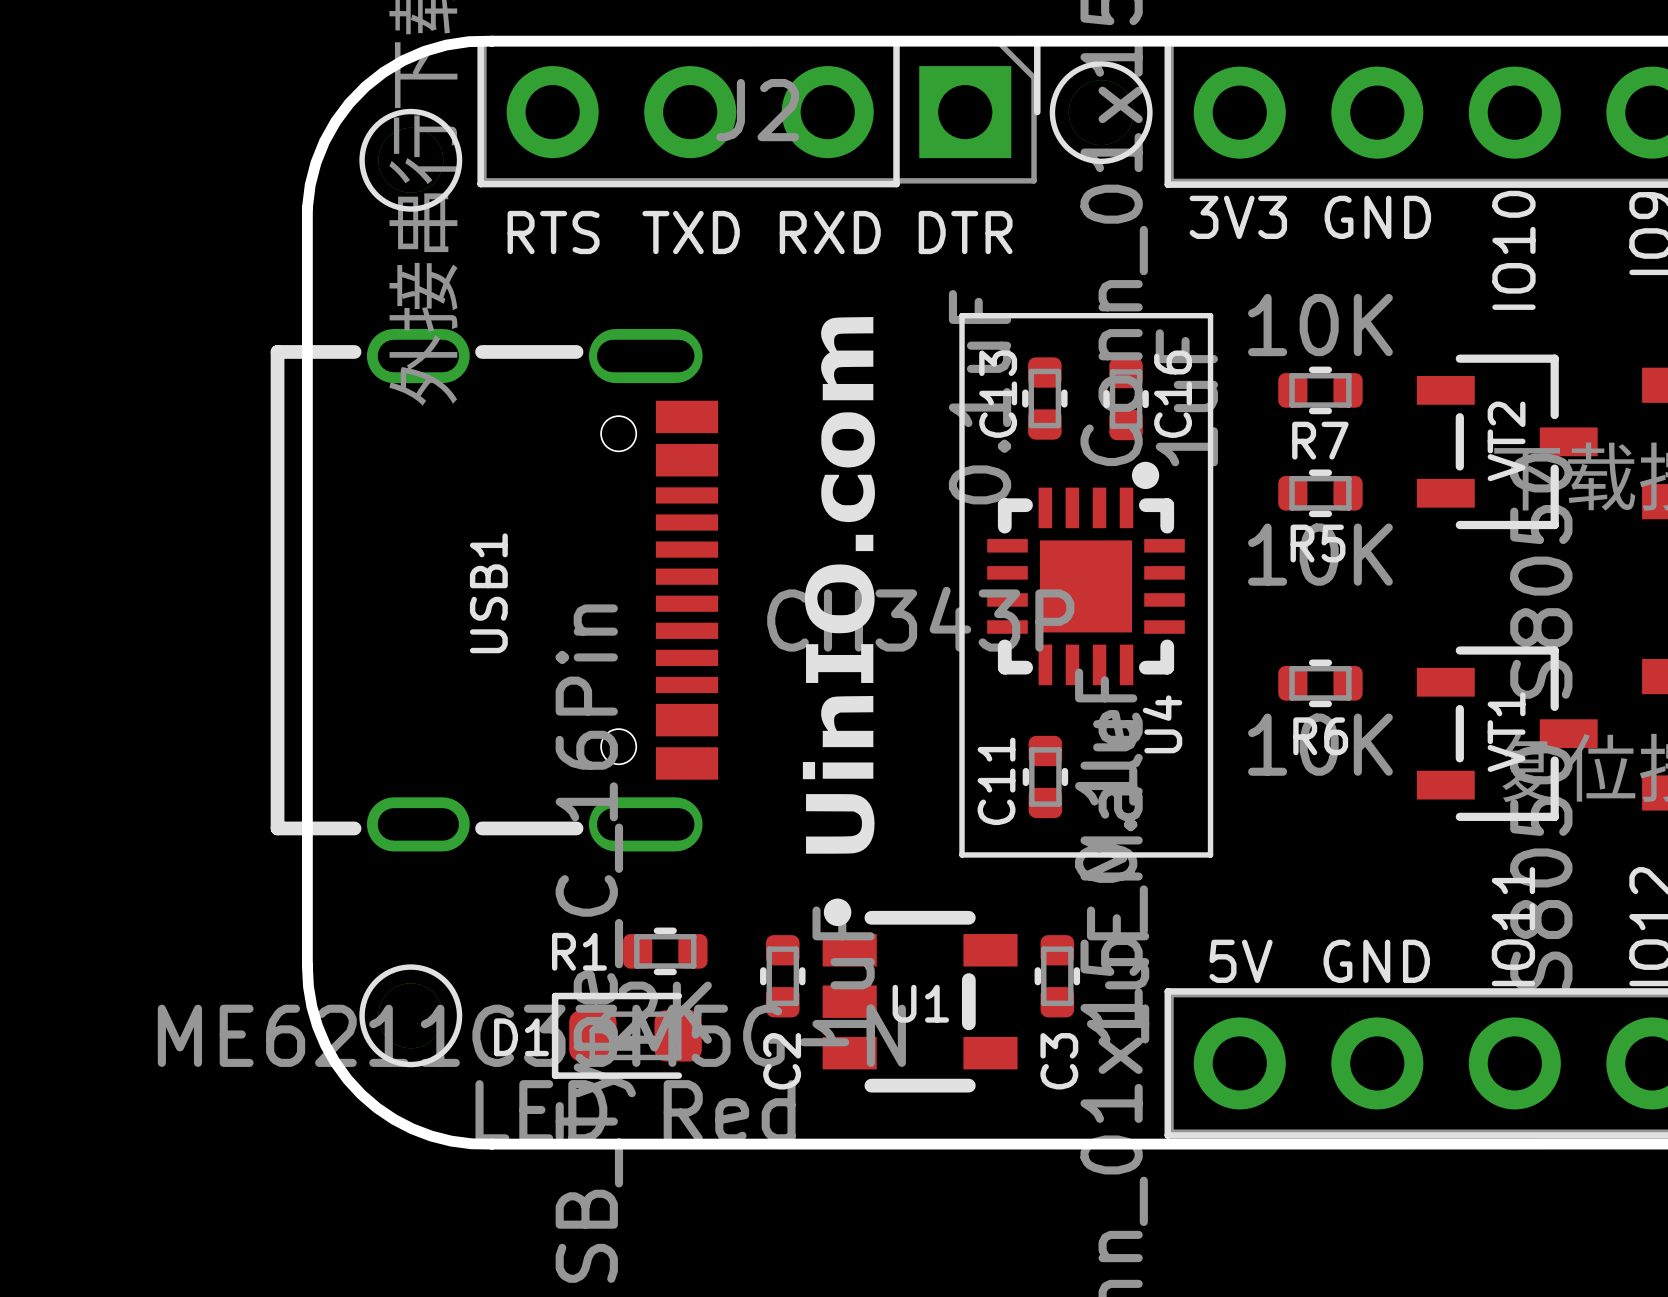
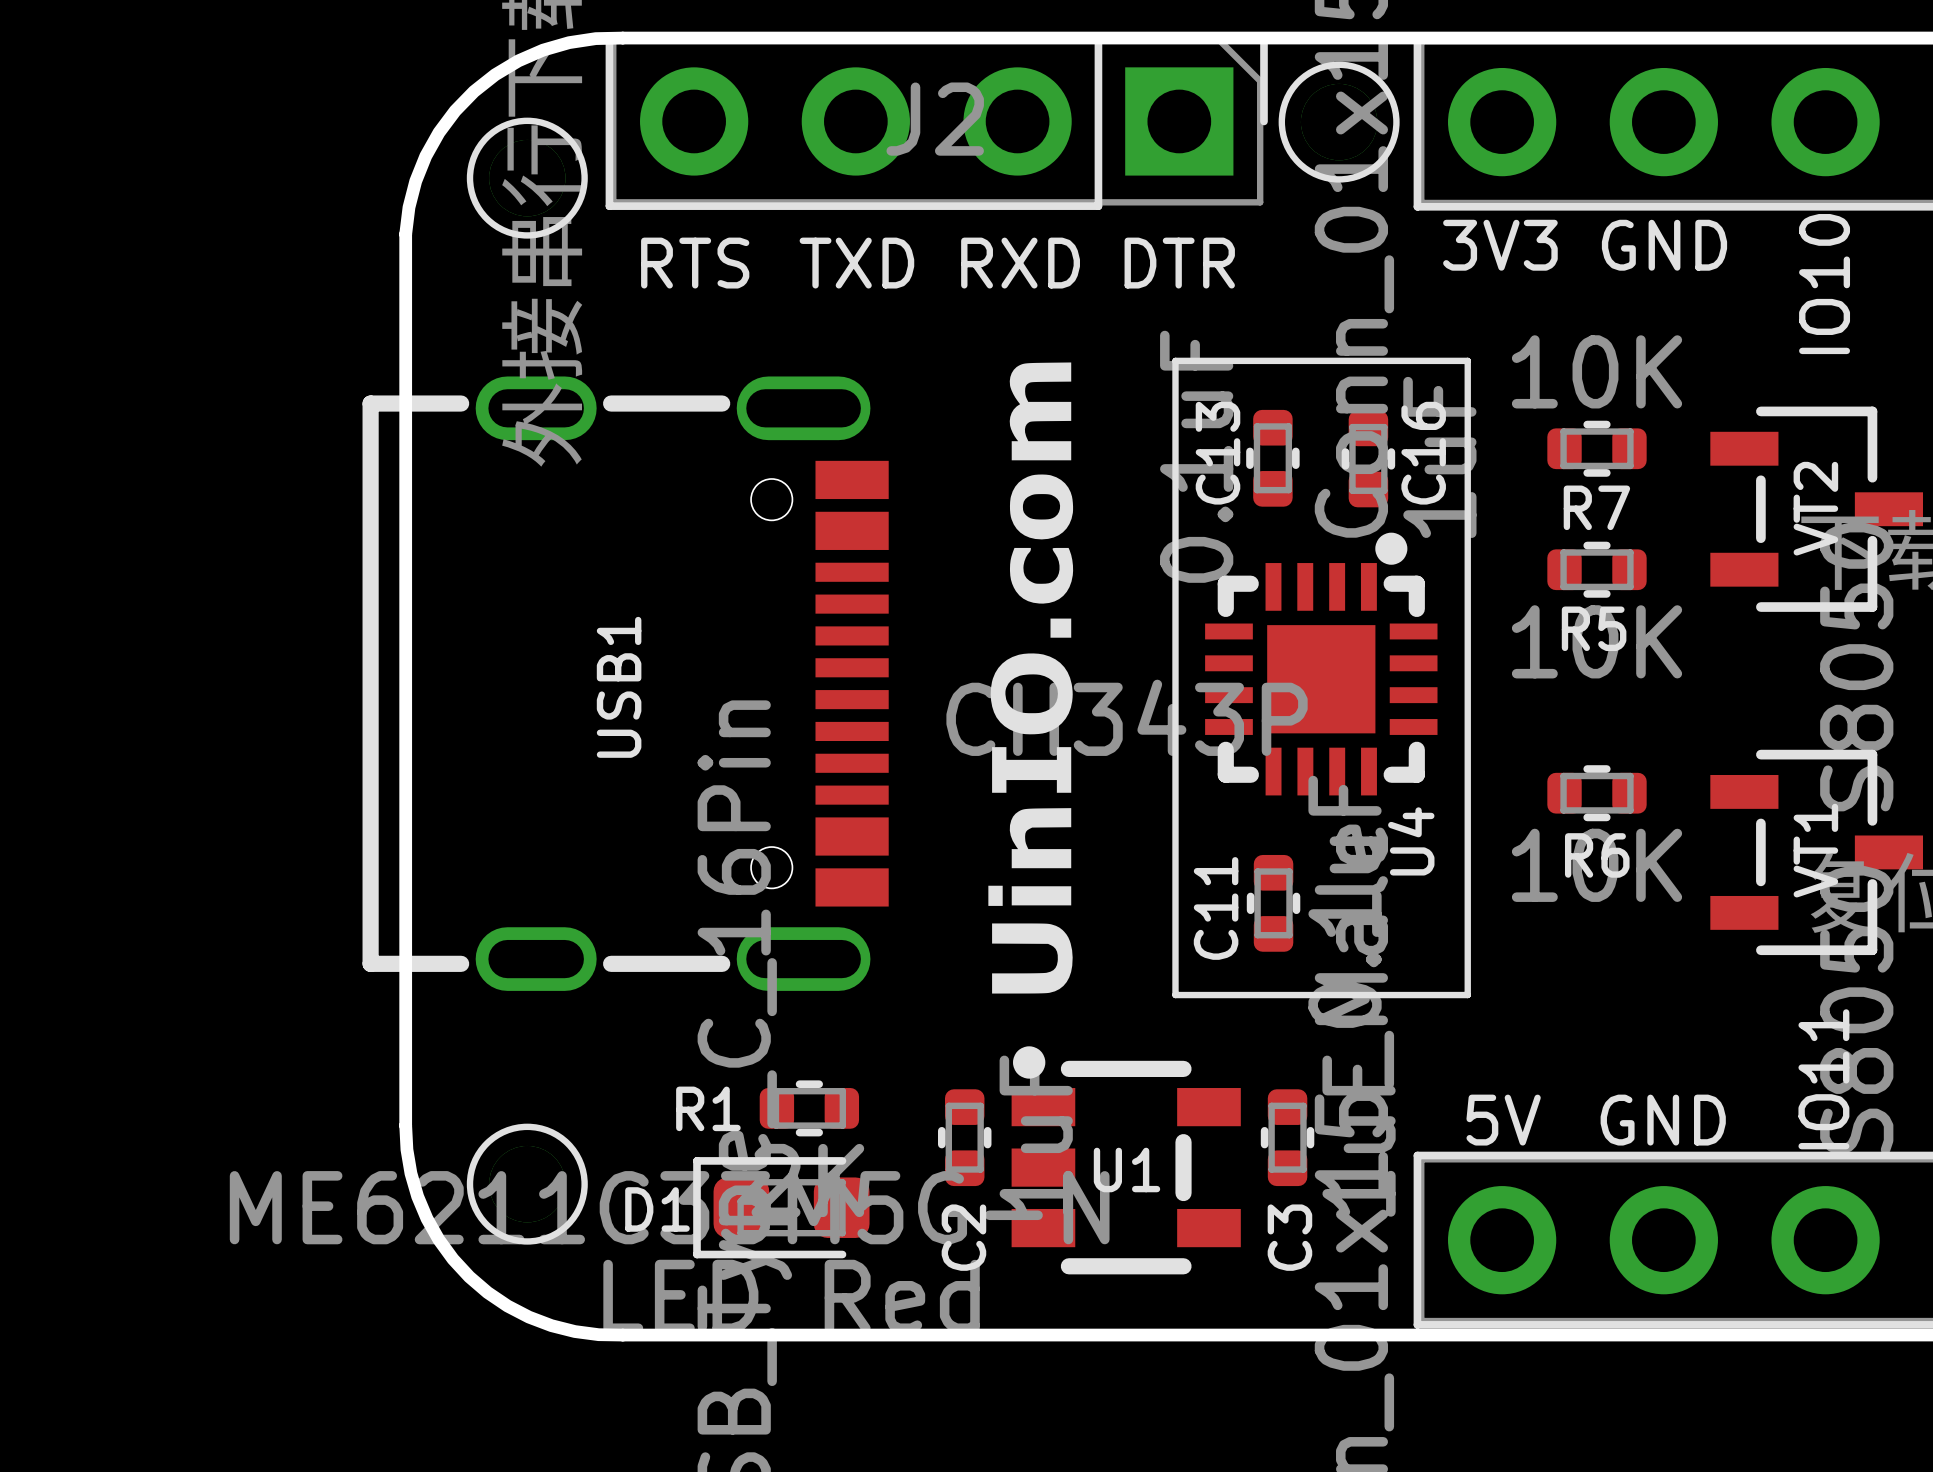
R1 position: (665, 951) -> (809, 1108)

